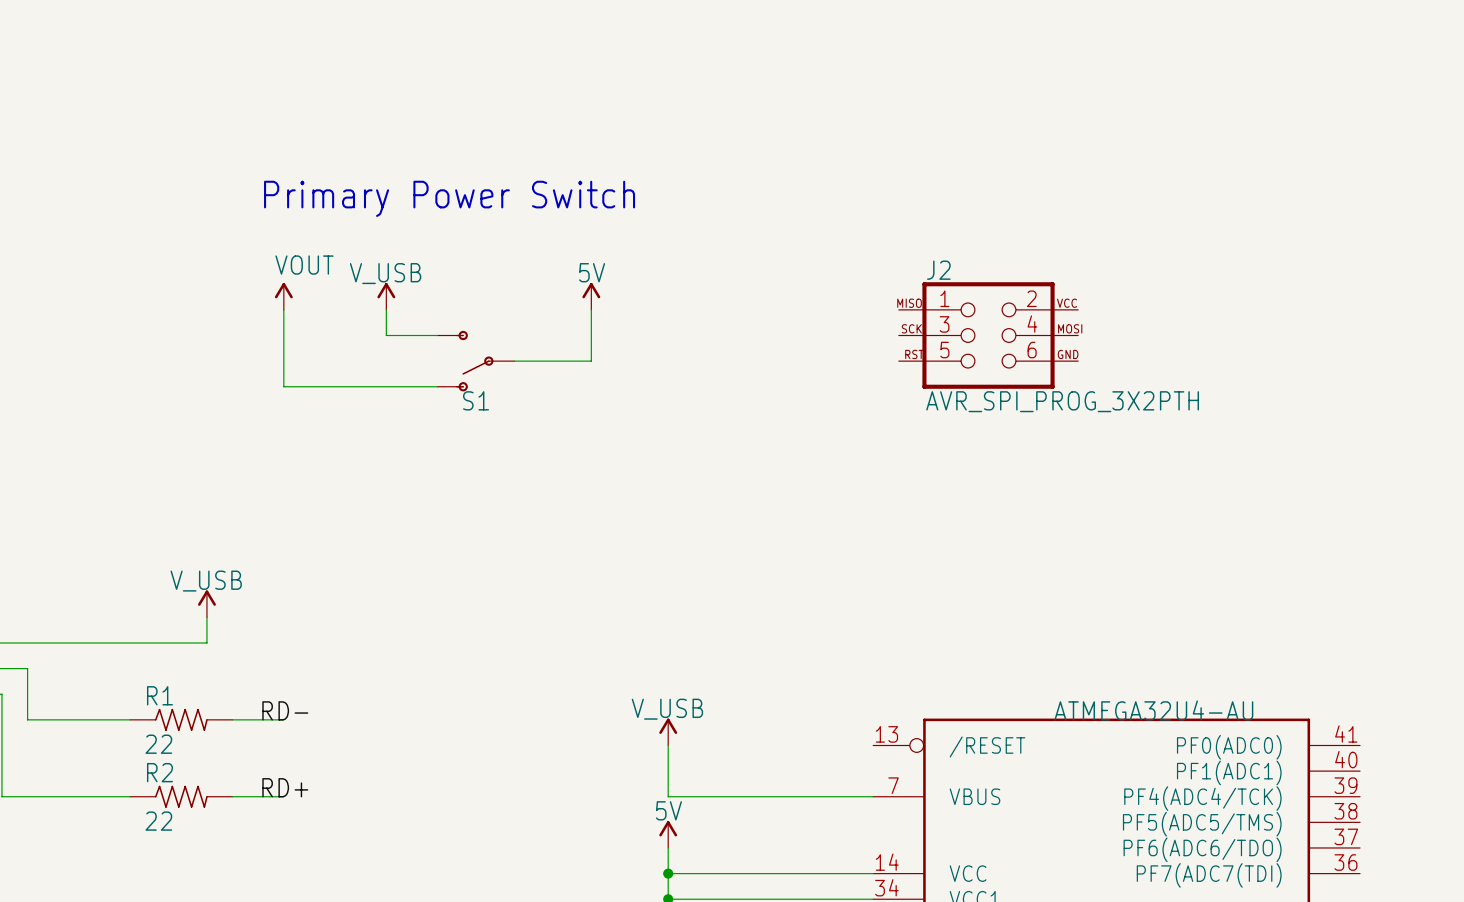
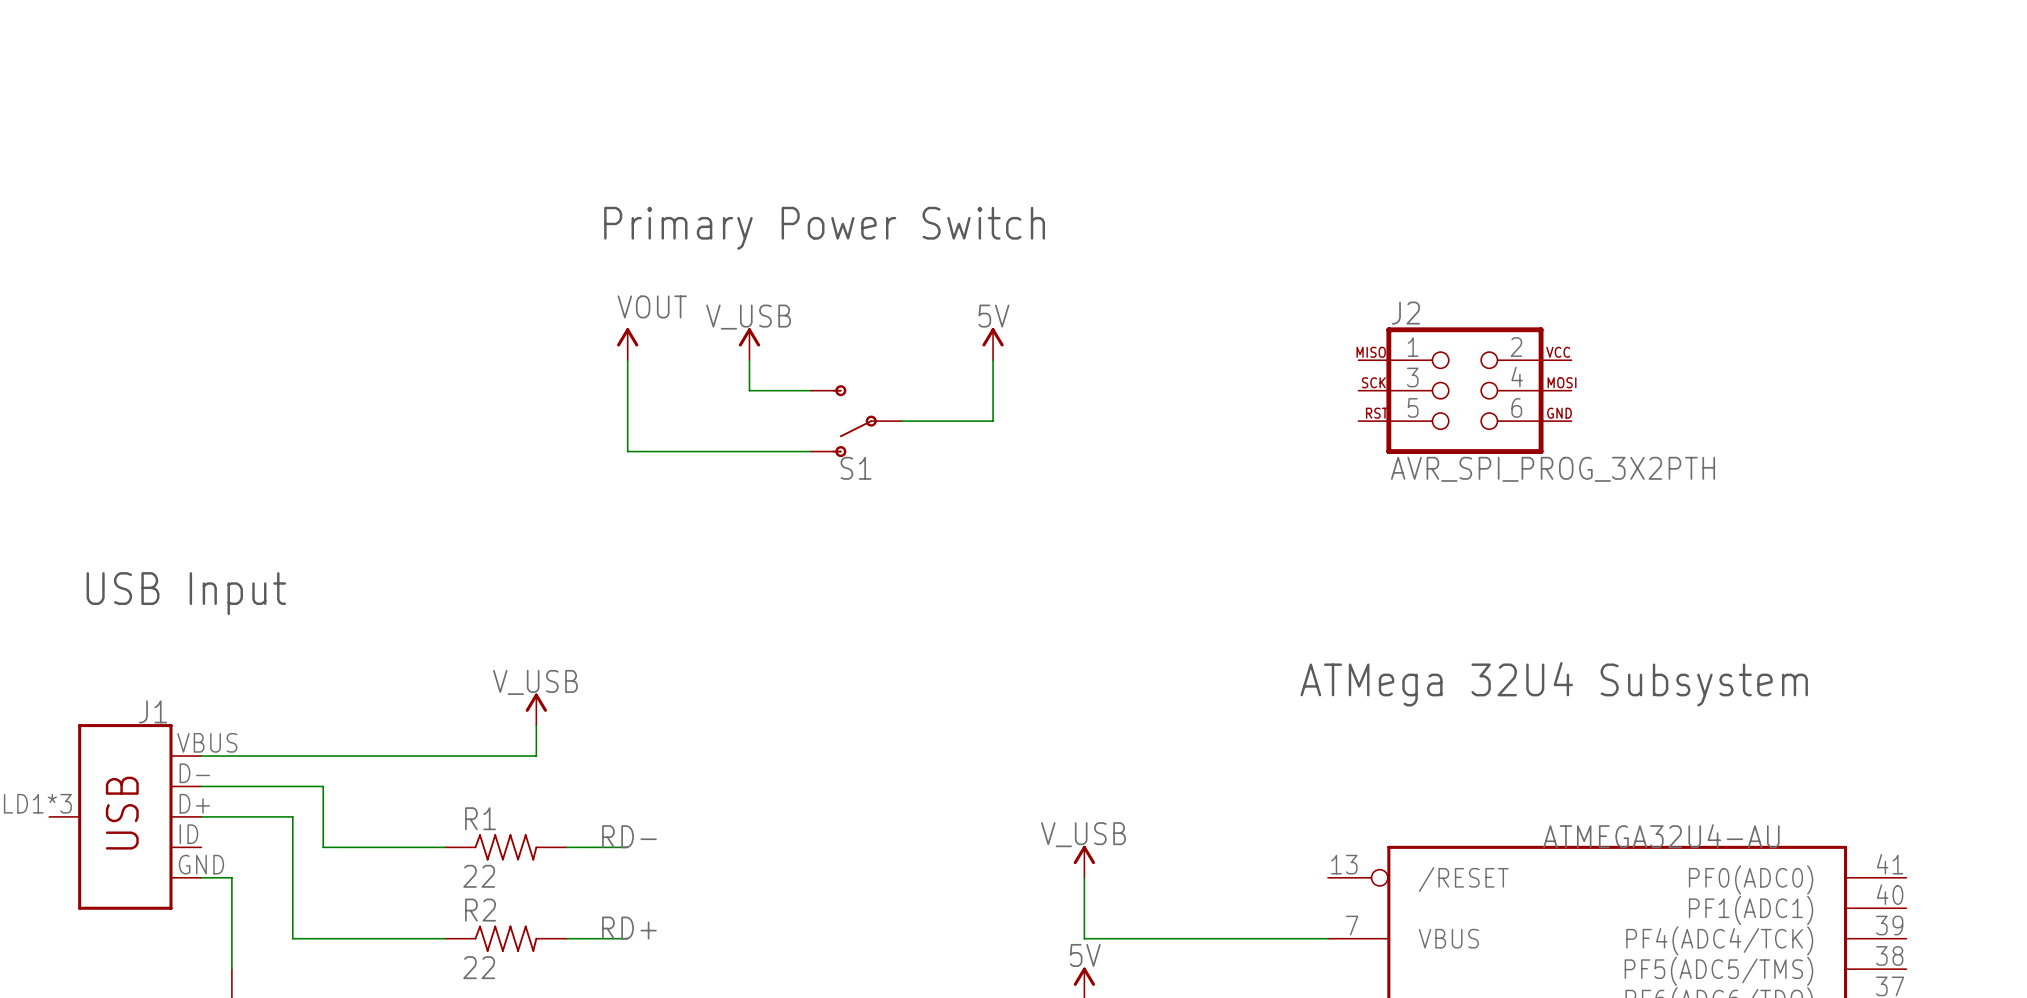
text: none -> ATMega 32U4 Subsystem (1554, 684)

